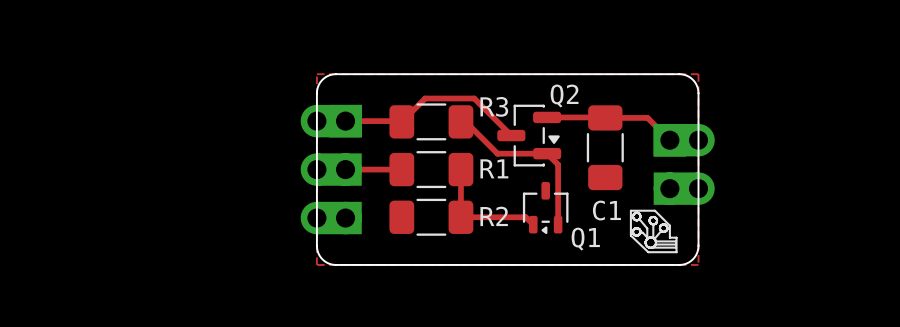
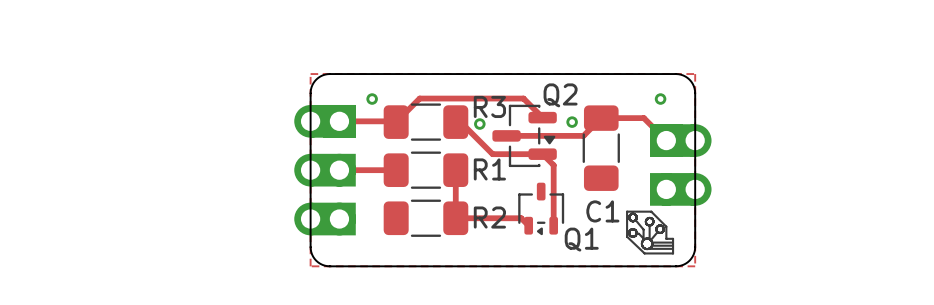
via: none -> (372, 99)
track: (474, 98) (511, 135) -> (469, 98) (523, 98) (542, 117)
via: none -> (660, 99)
track: (547, 117) (605, 117) -> (506, 135) (583, 135) (601, 118)
via: none -> (572, 122)
via: none -> (479, 124)

